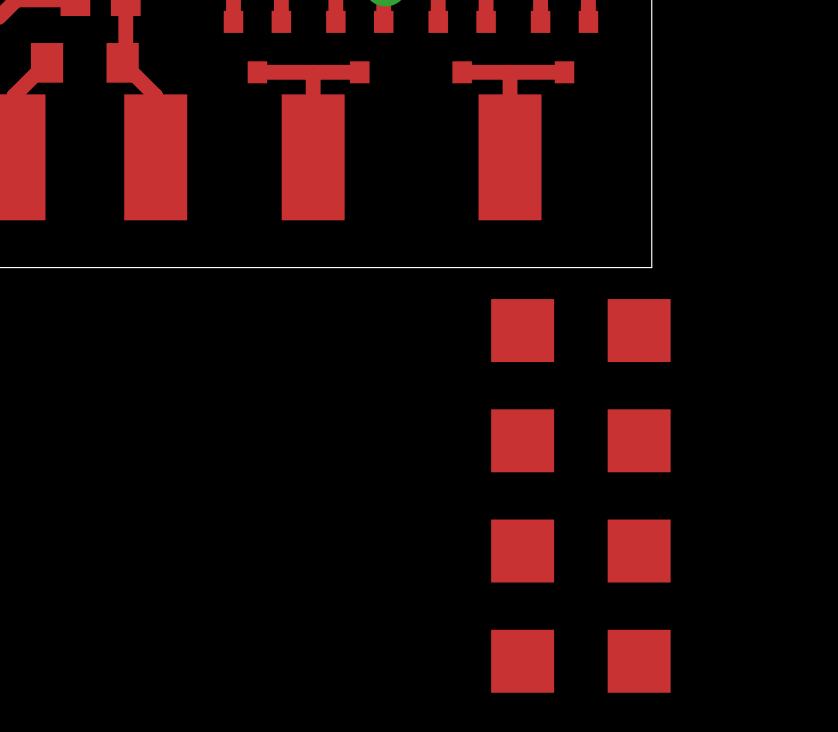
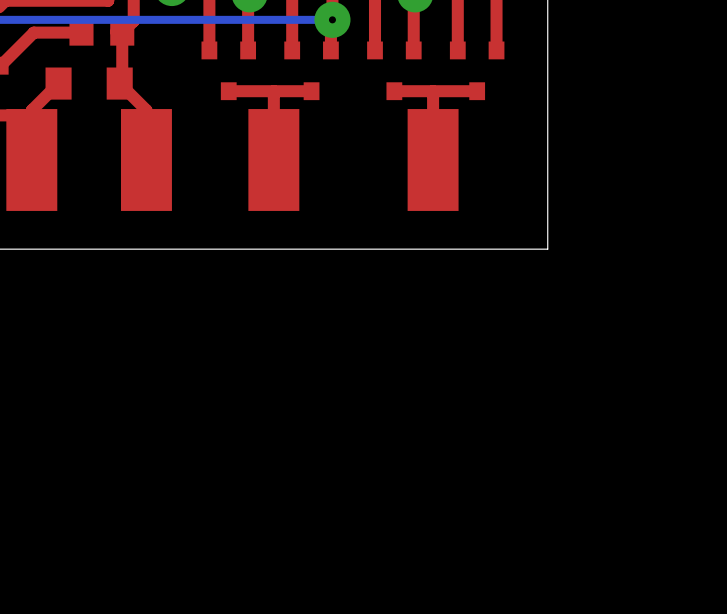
part: (580, 330) -> none
part: (580, 440) -> none
part: (580, 551) -> none
part: (580, 661) -> none

